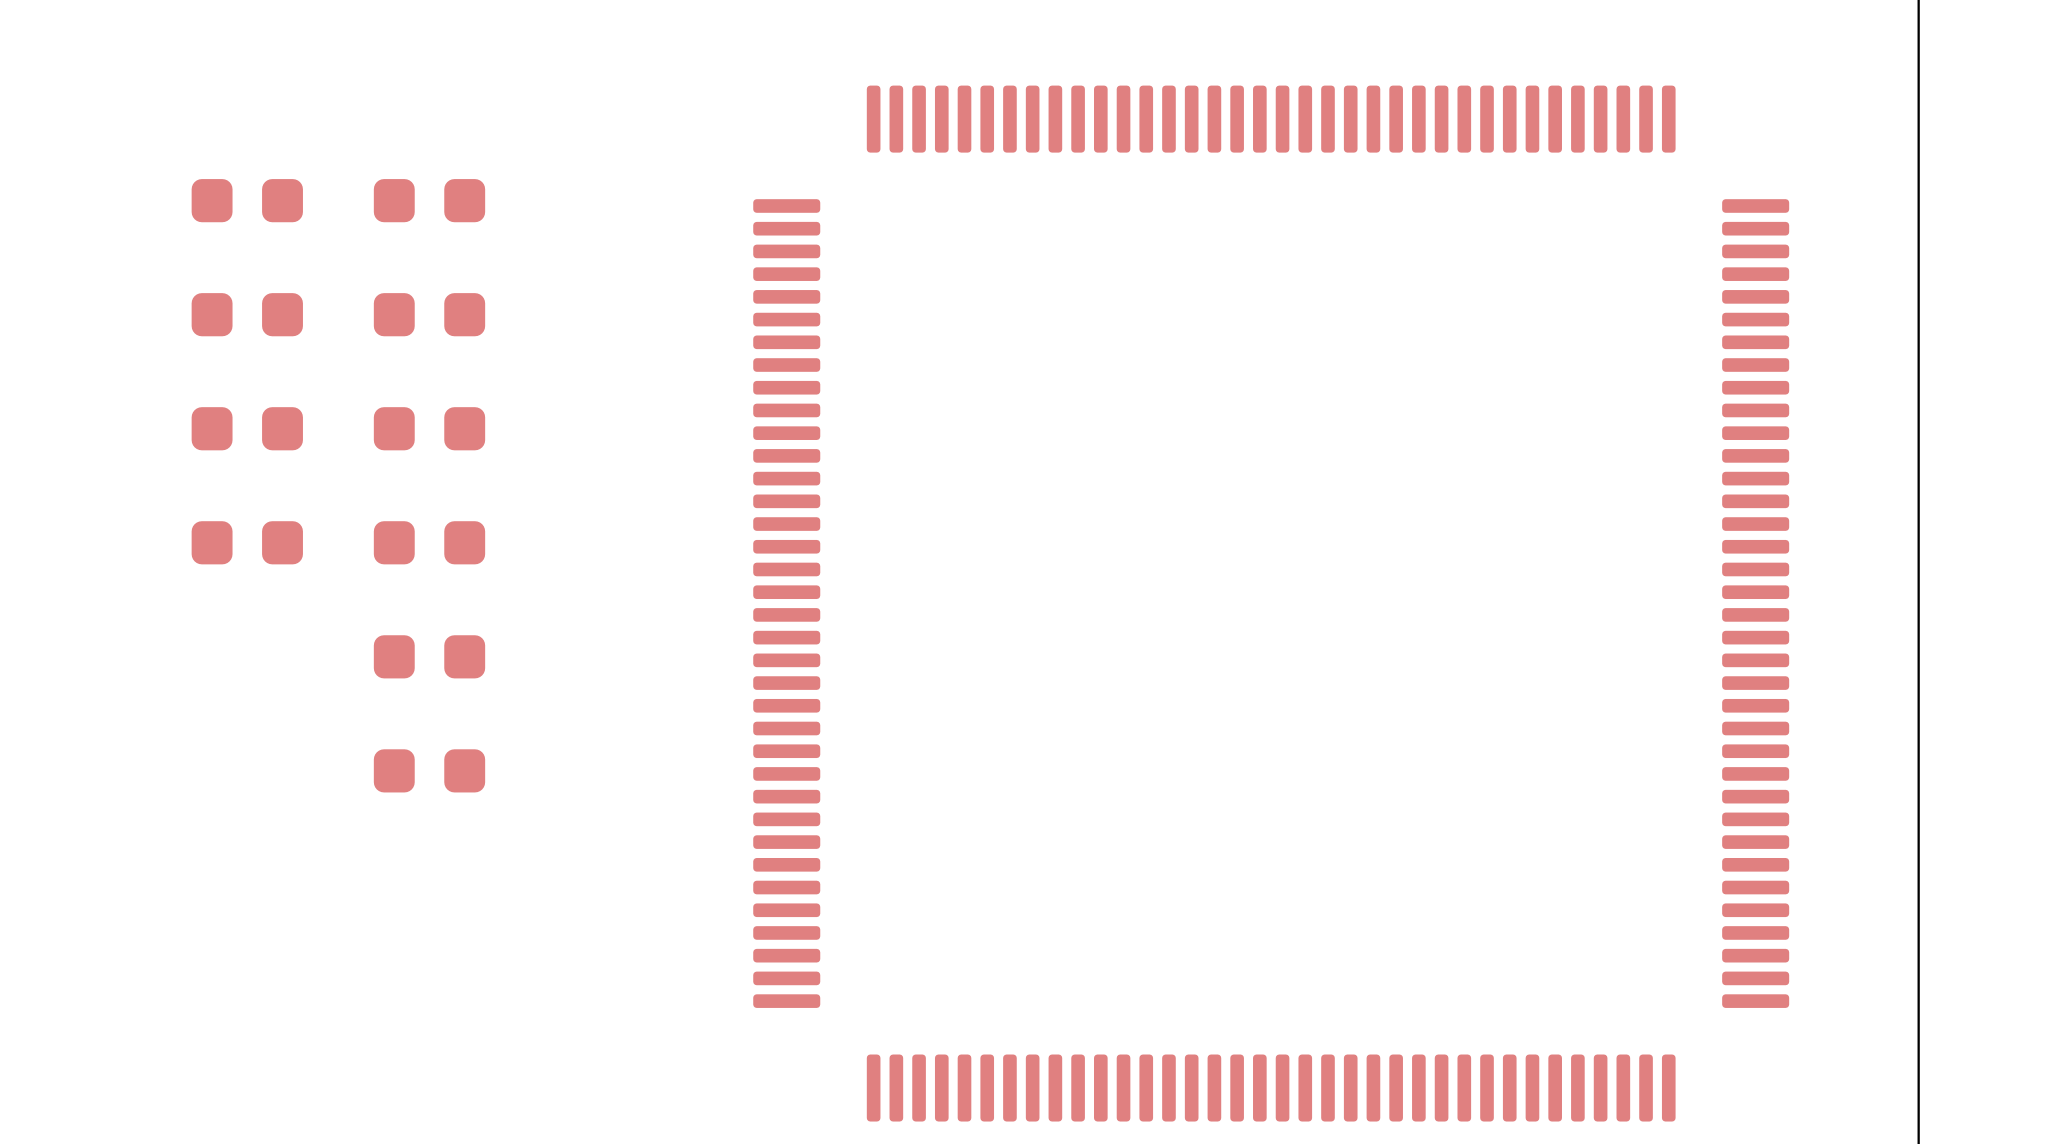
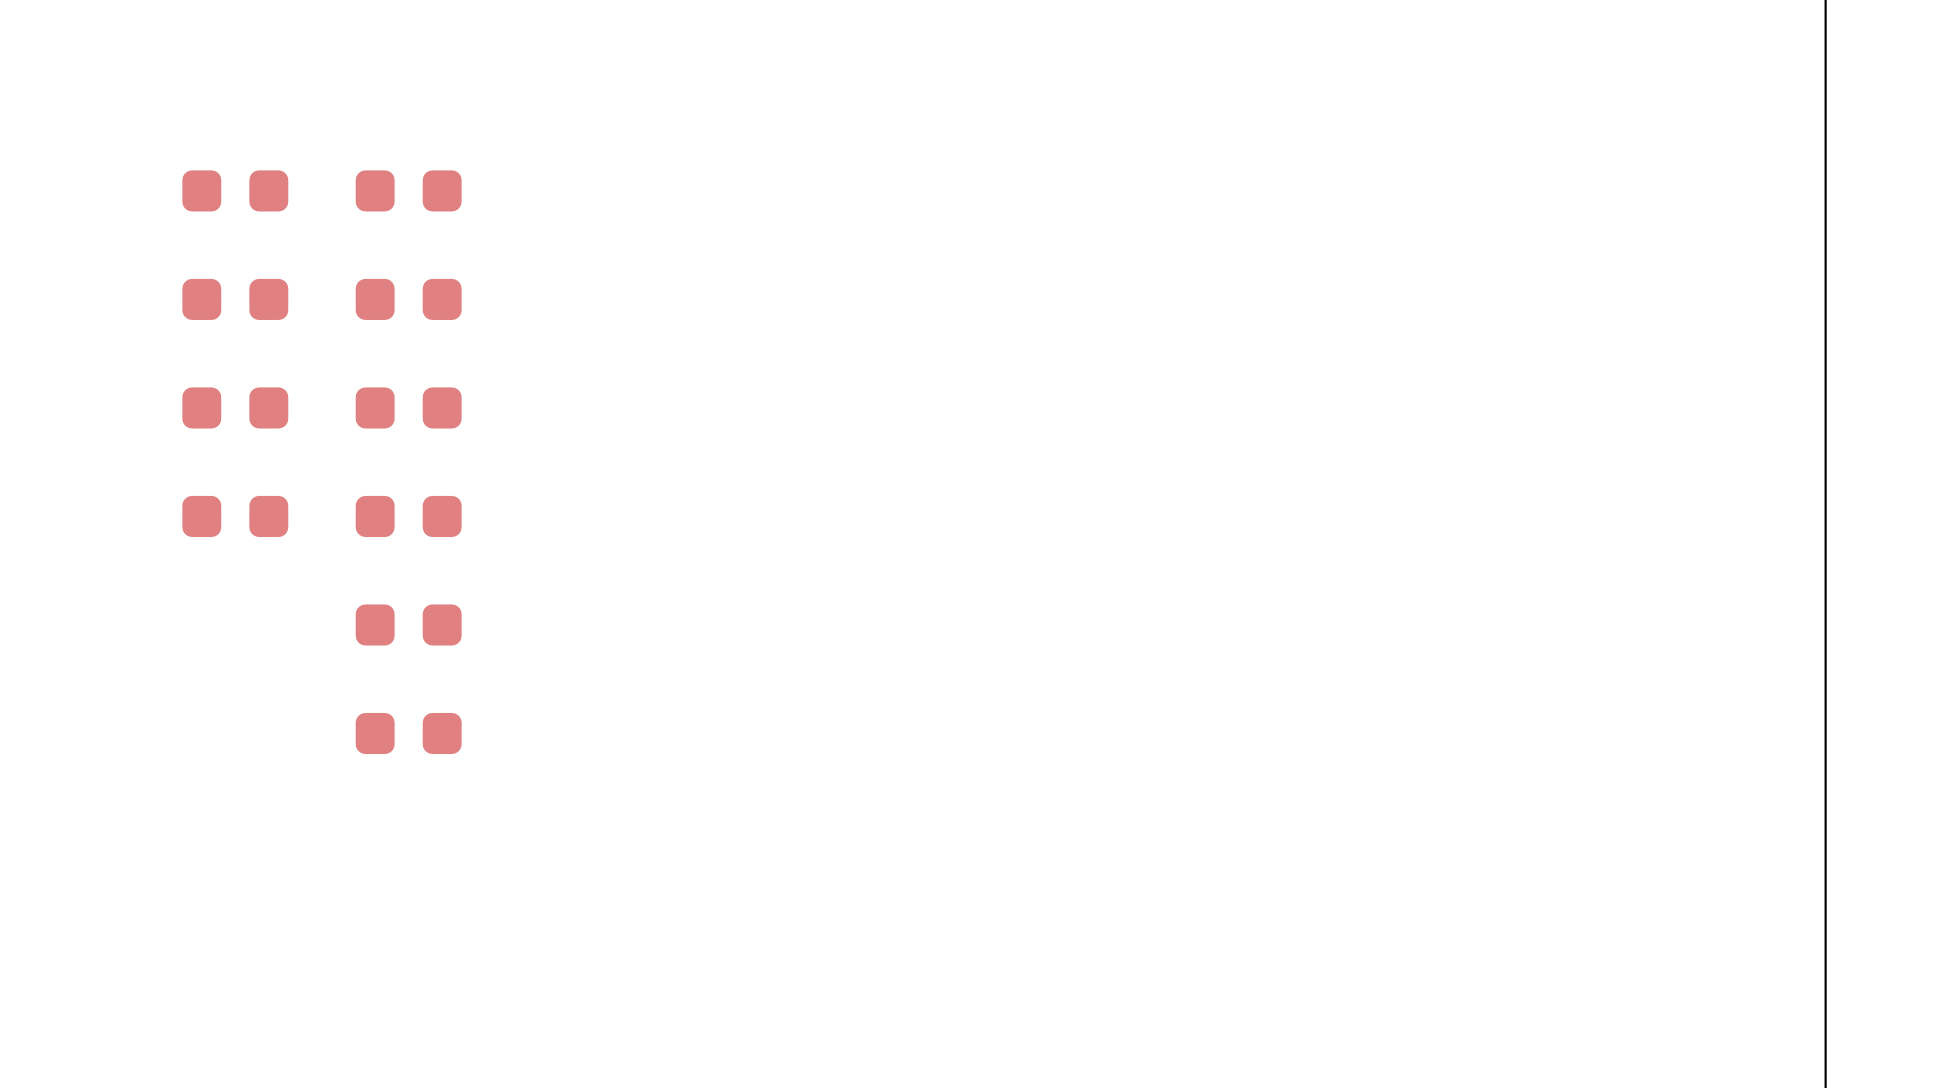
part: (1271, 603) -> none

